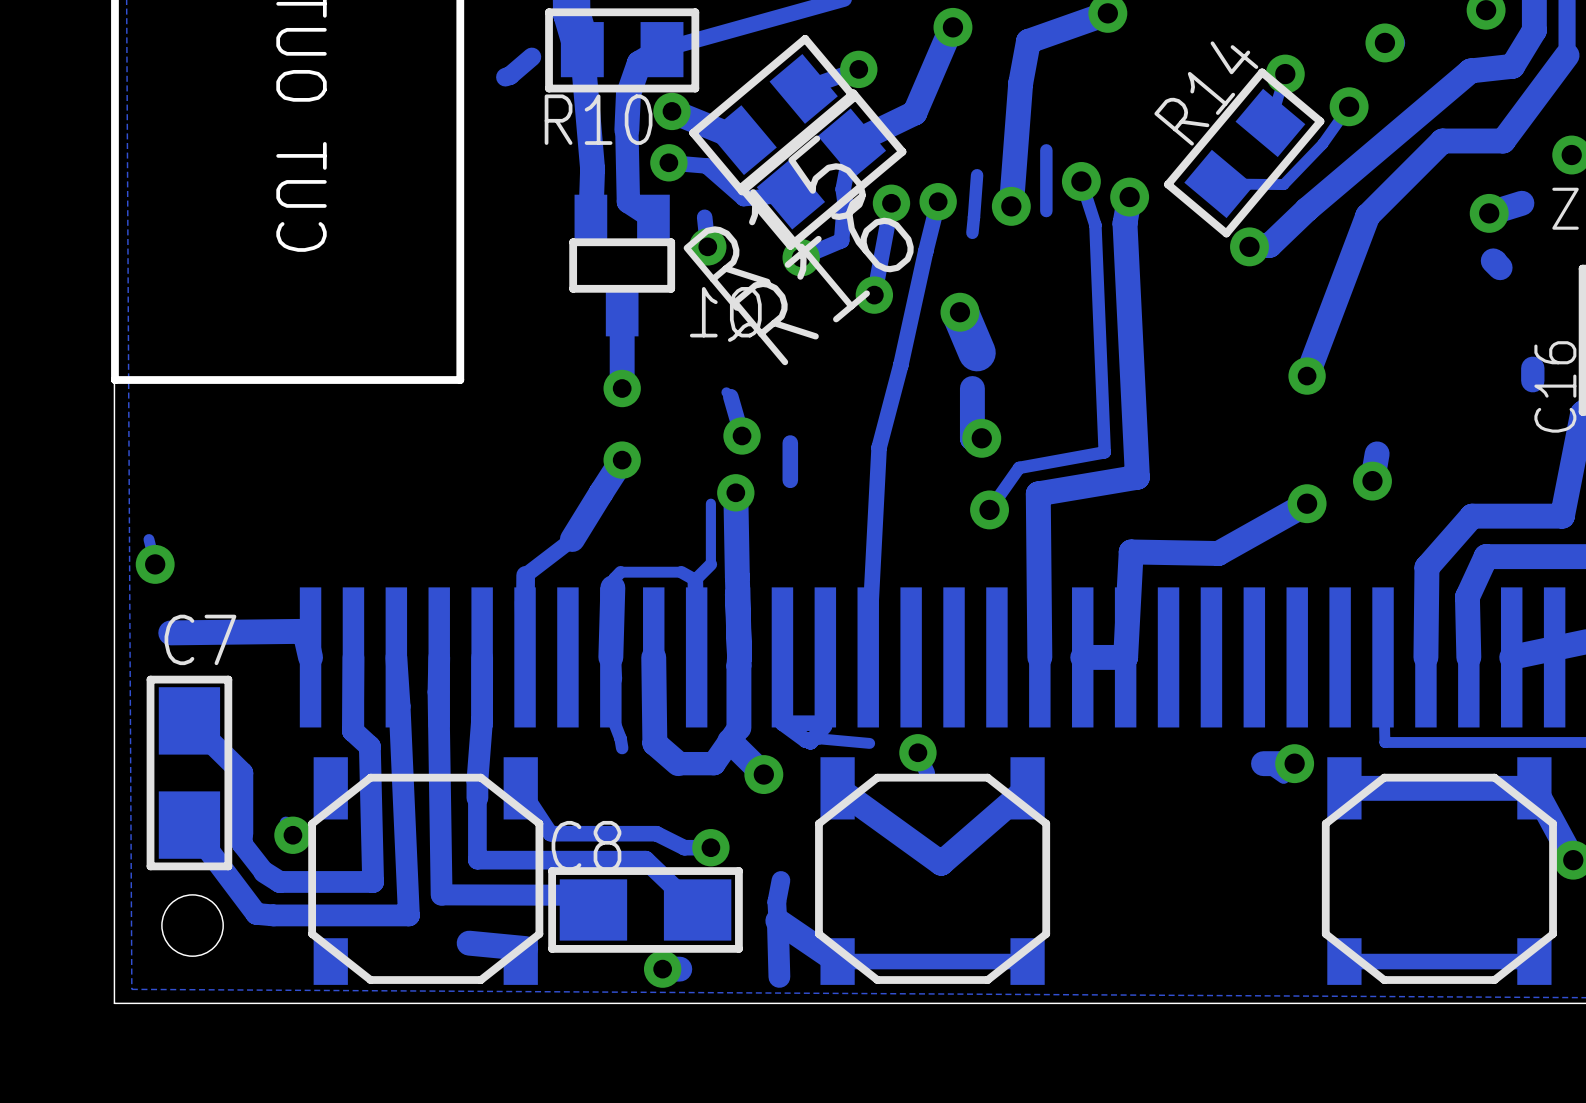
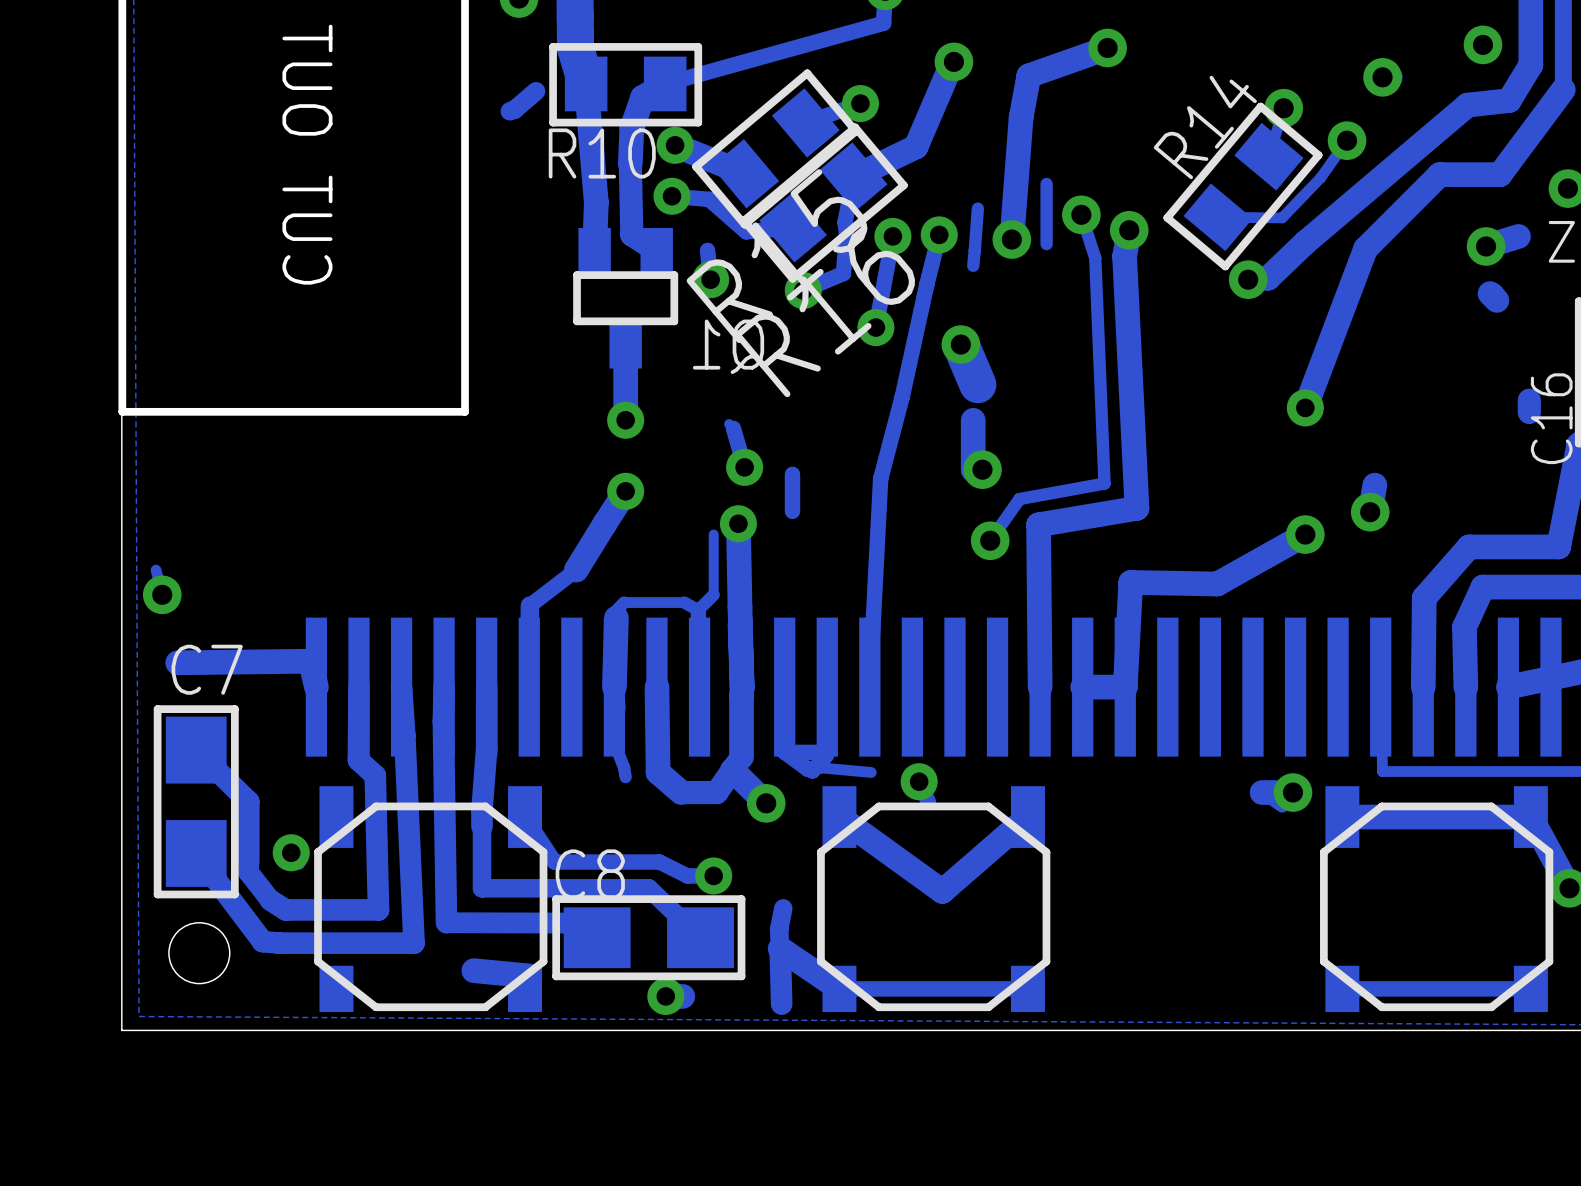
via position: (292, 835) -> (291, 852)

